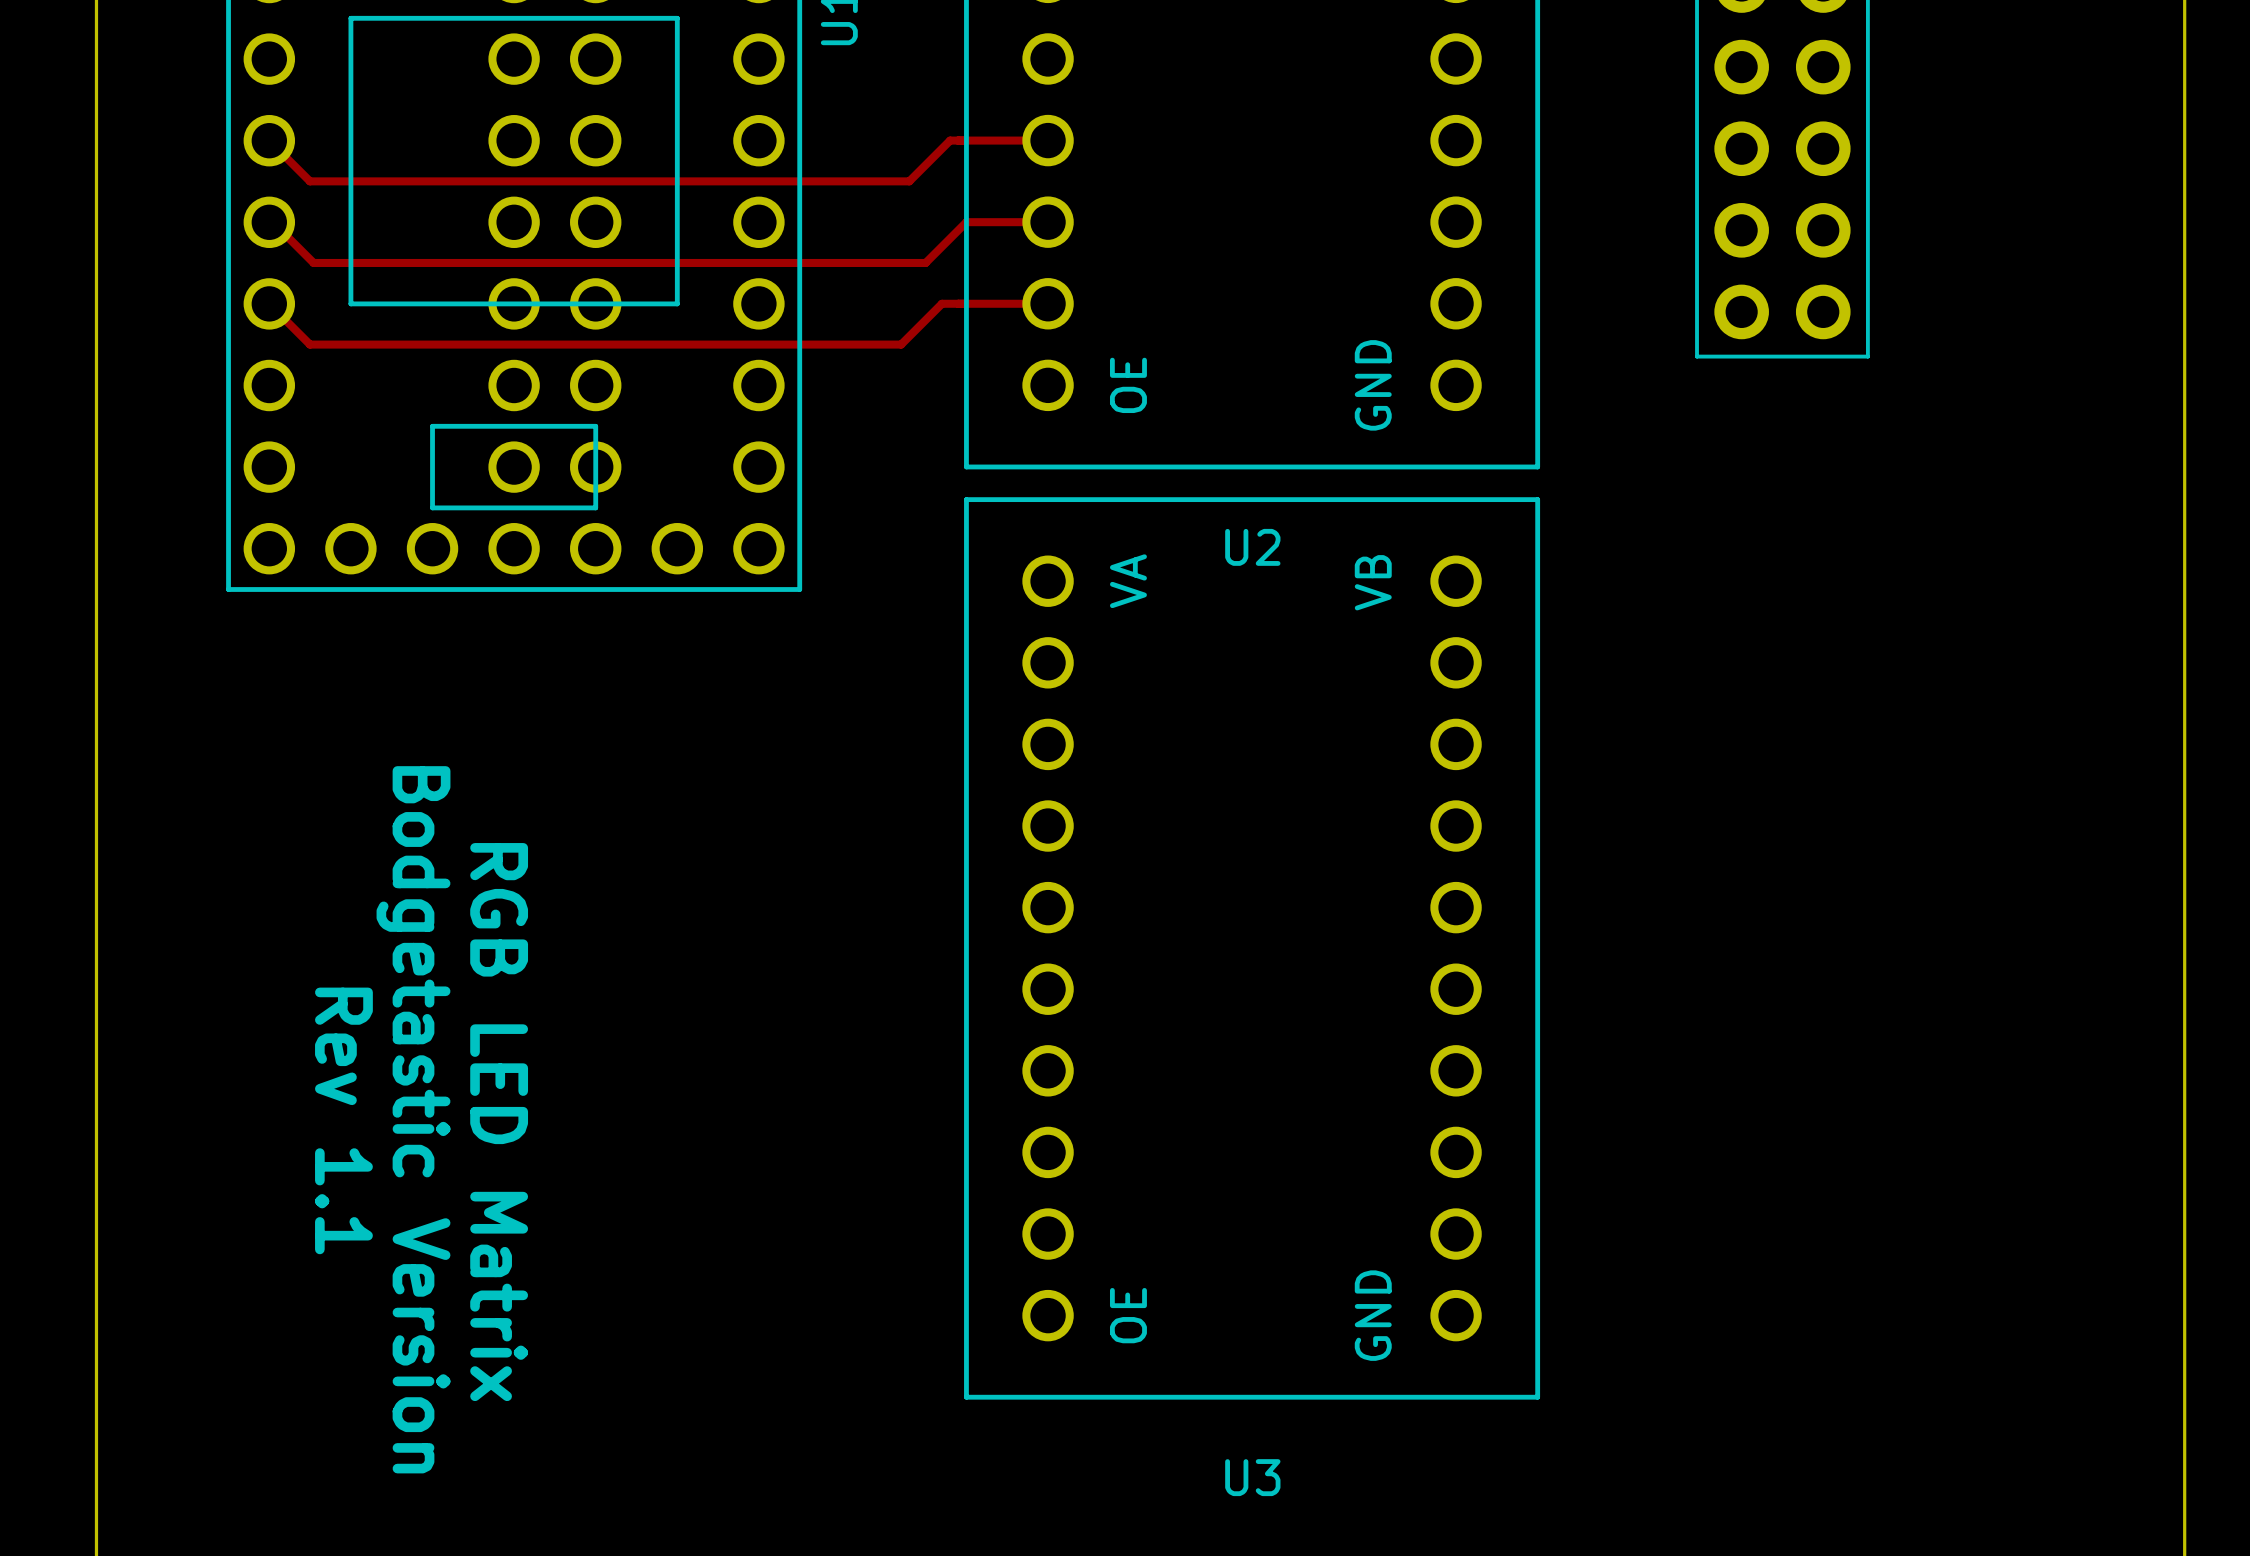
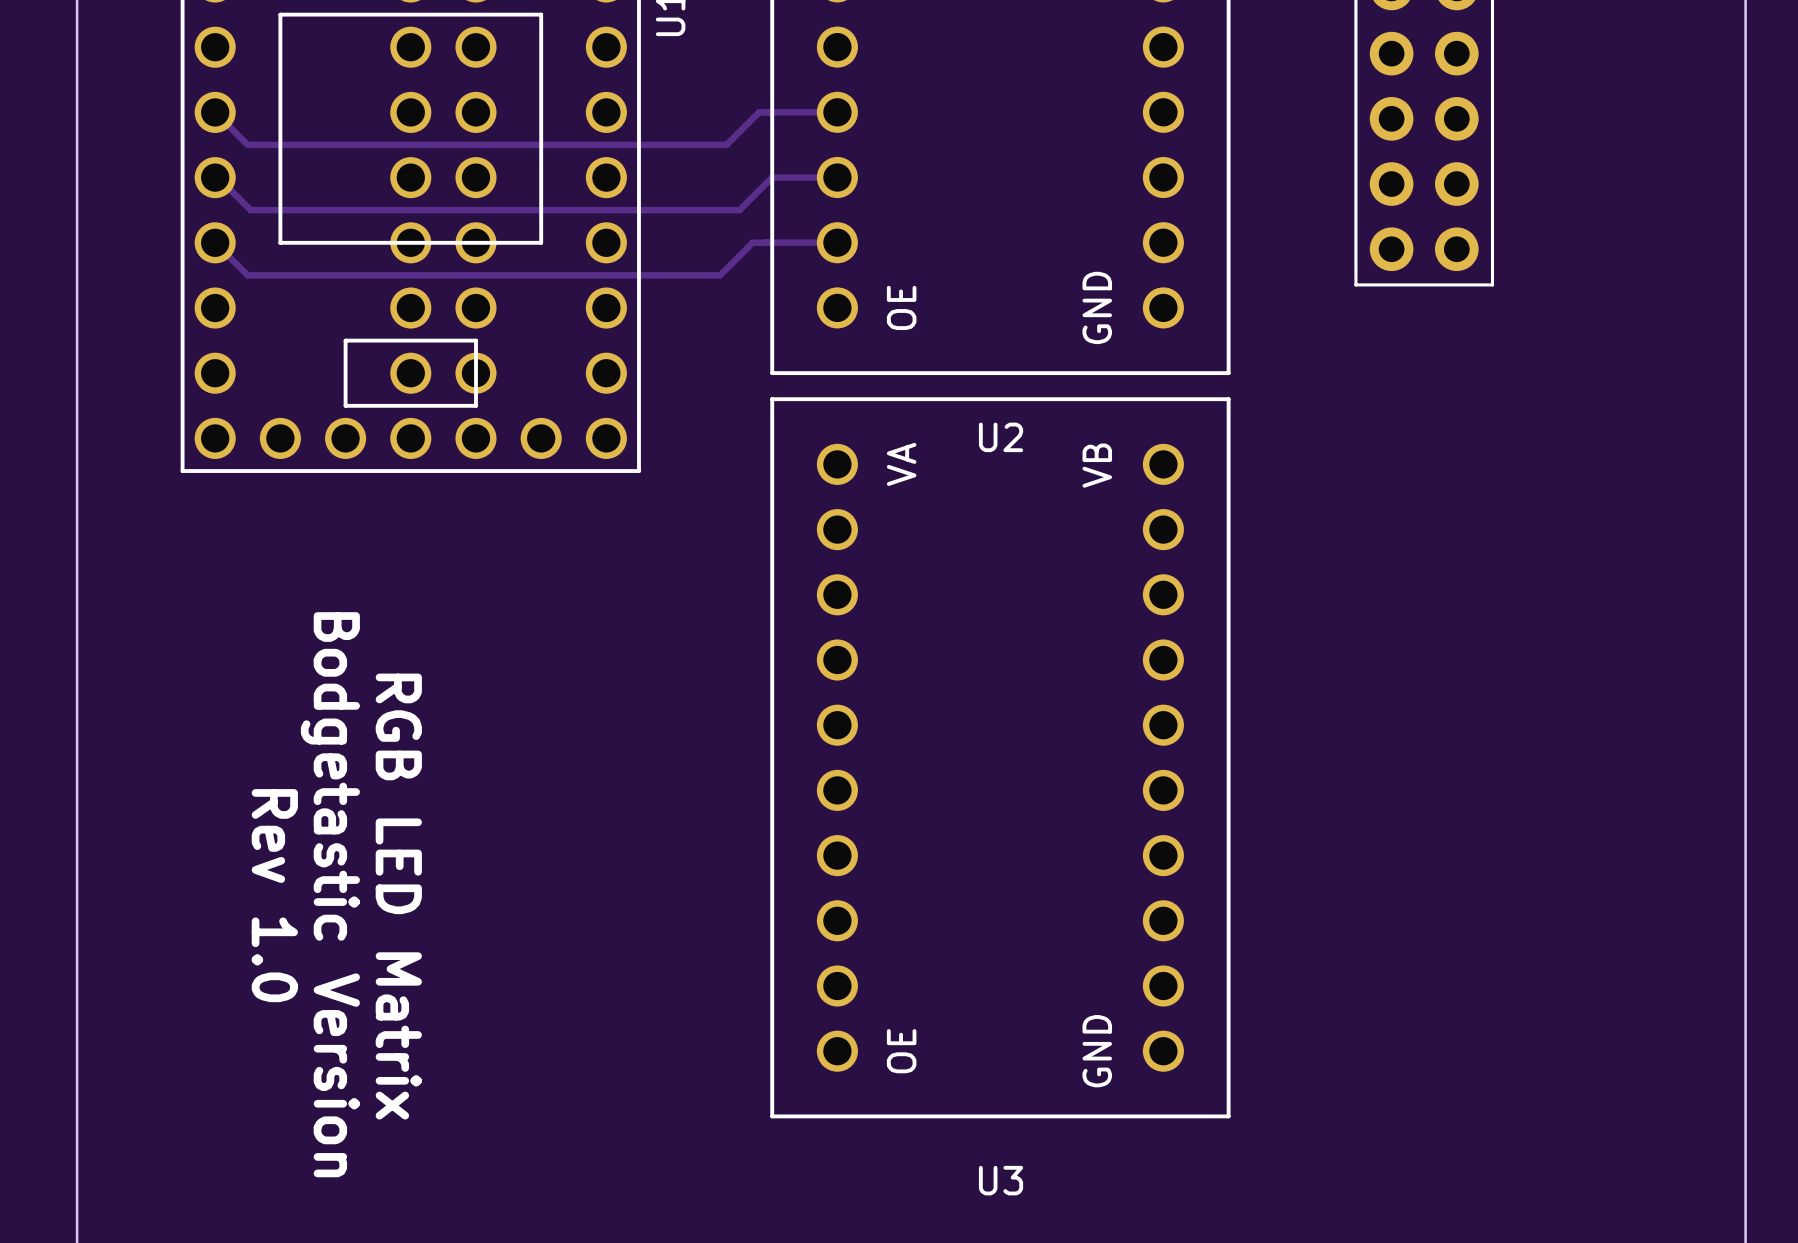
text: Rev 1.1 (343, 1120) -> Rev 1.0 (274, 895)

